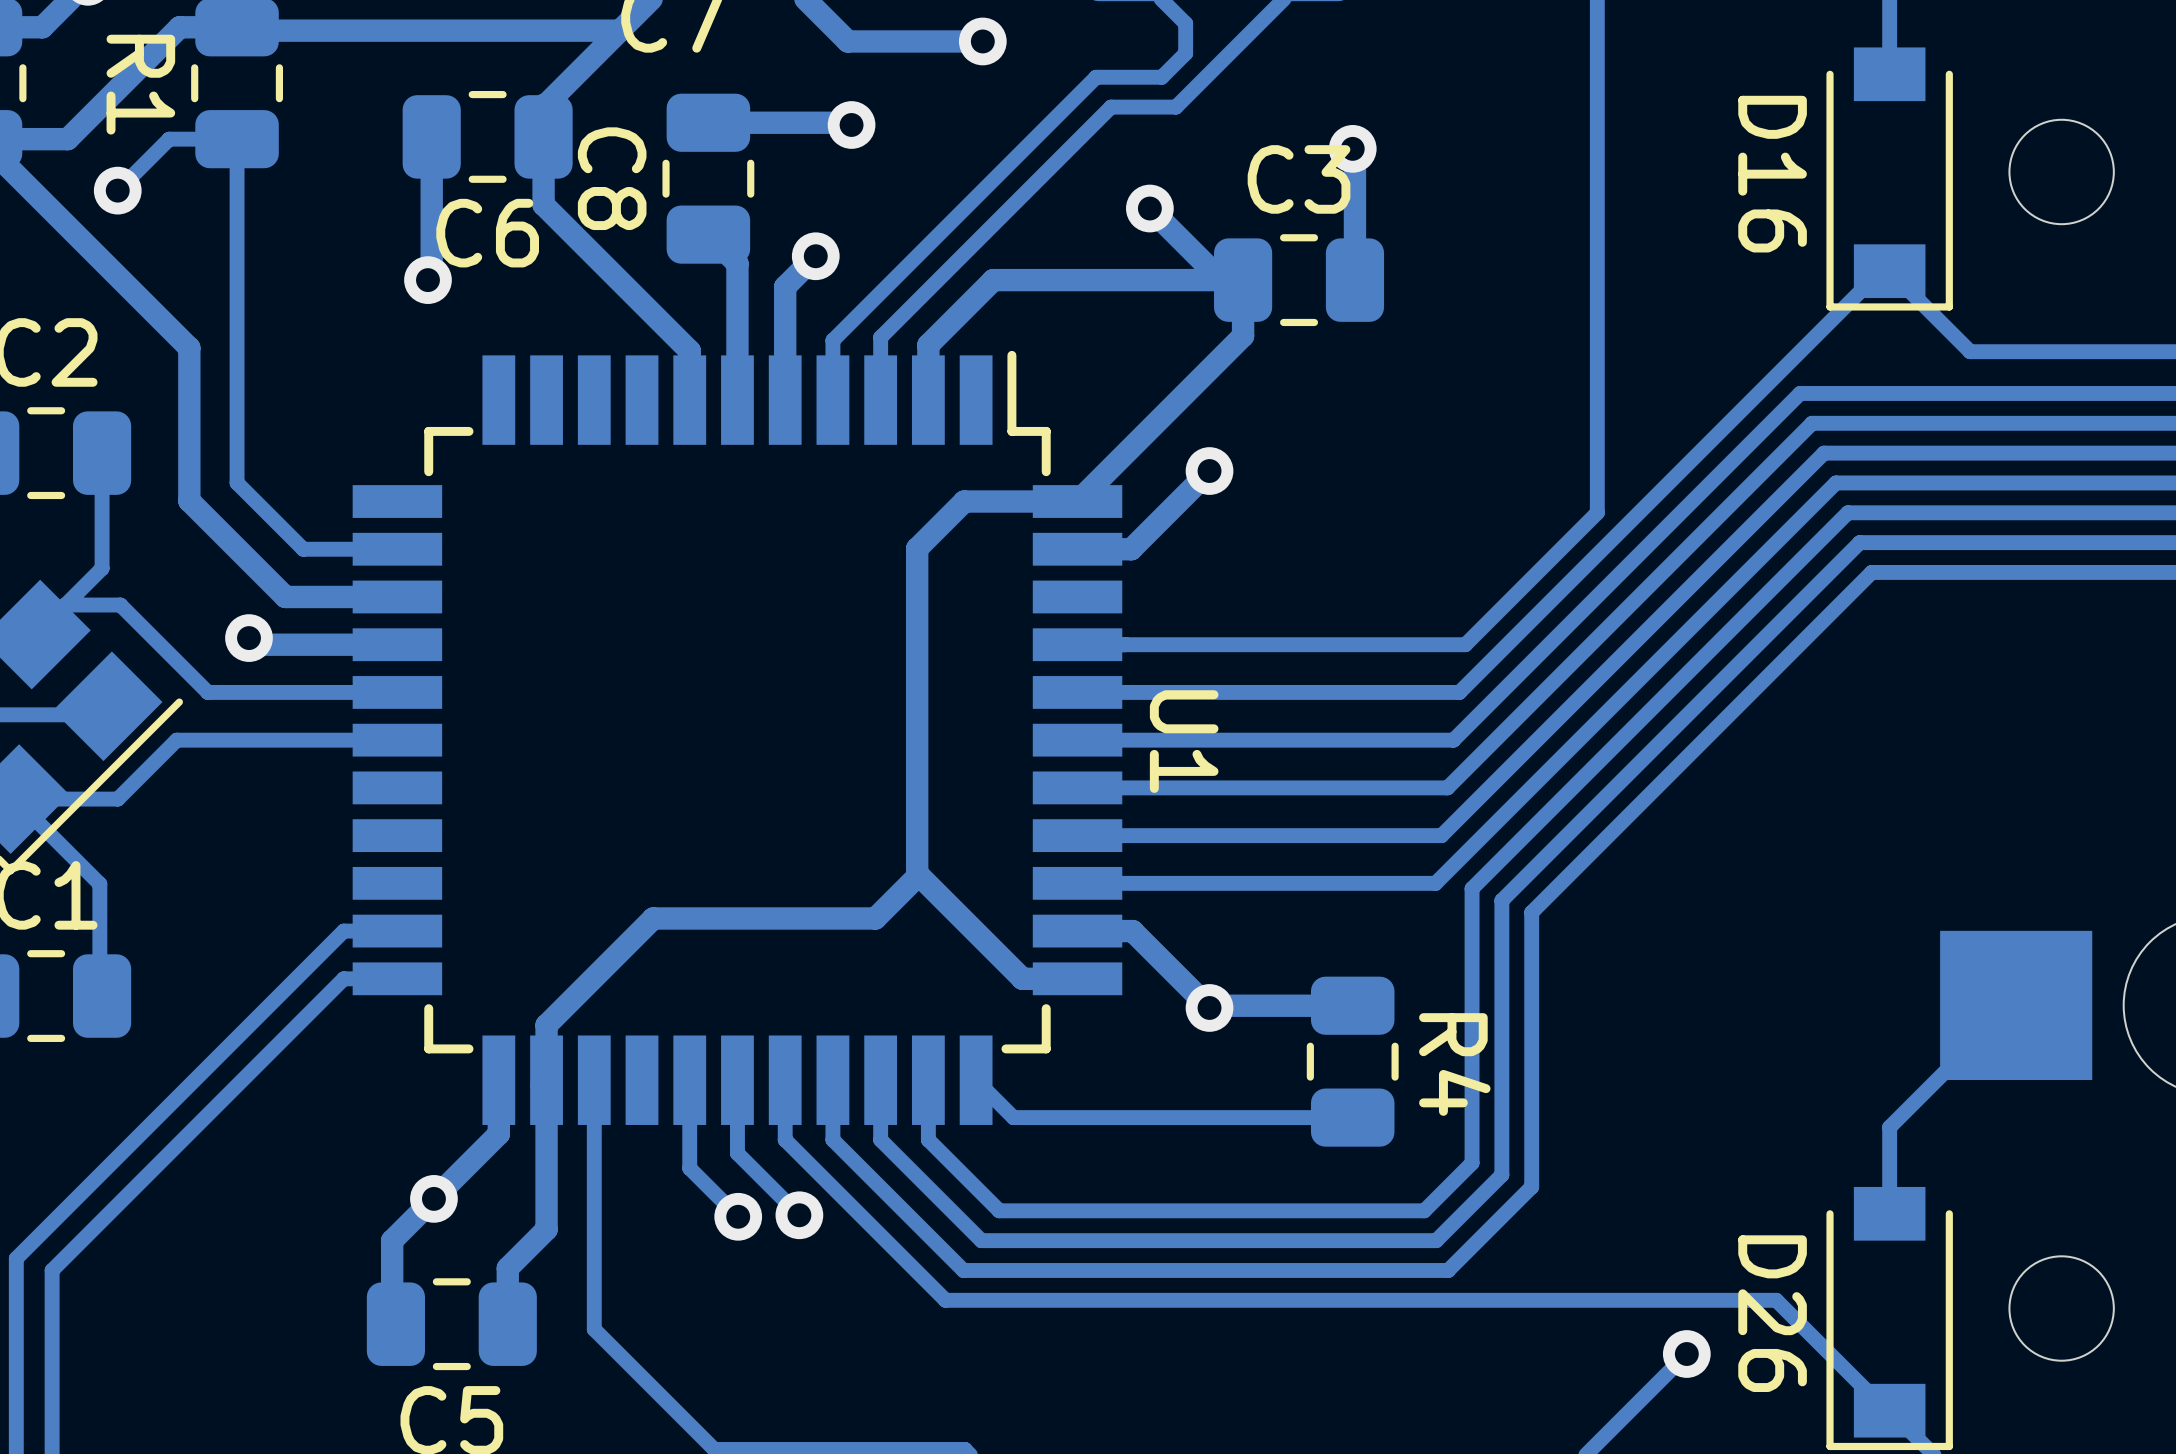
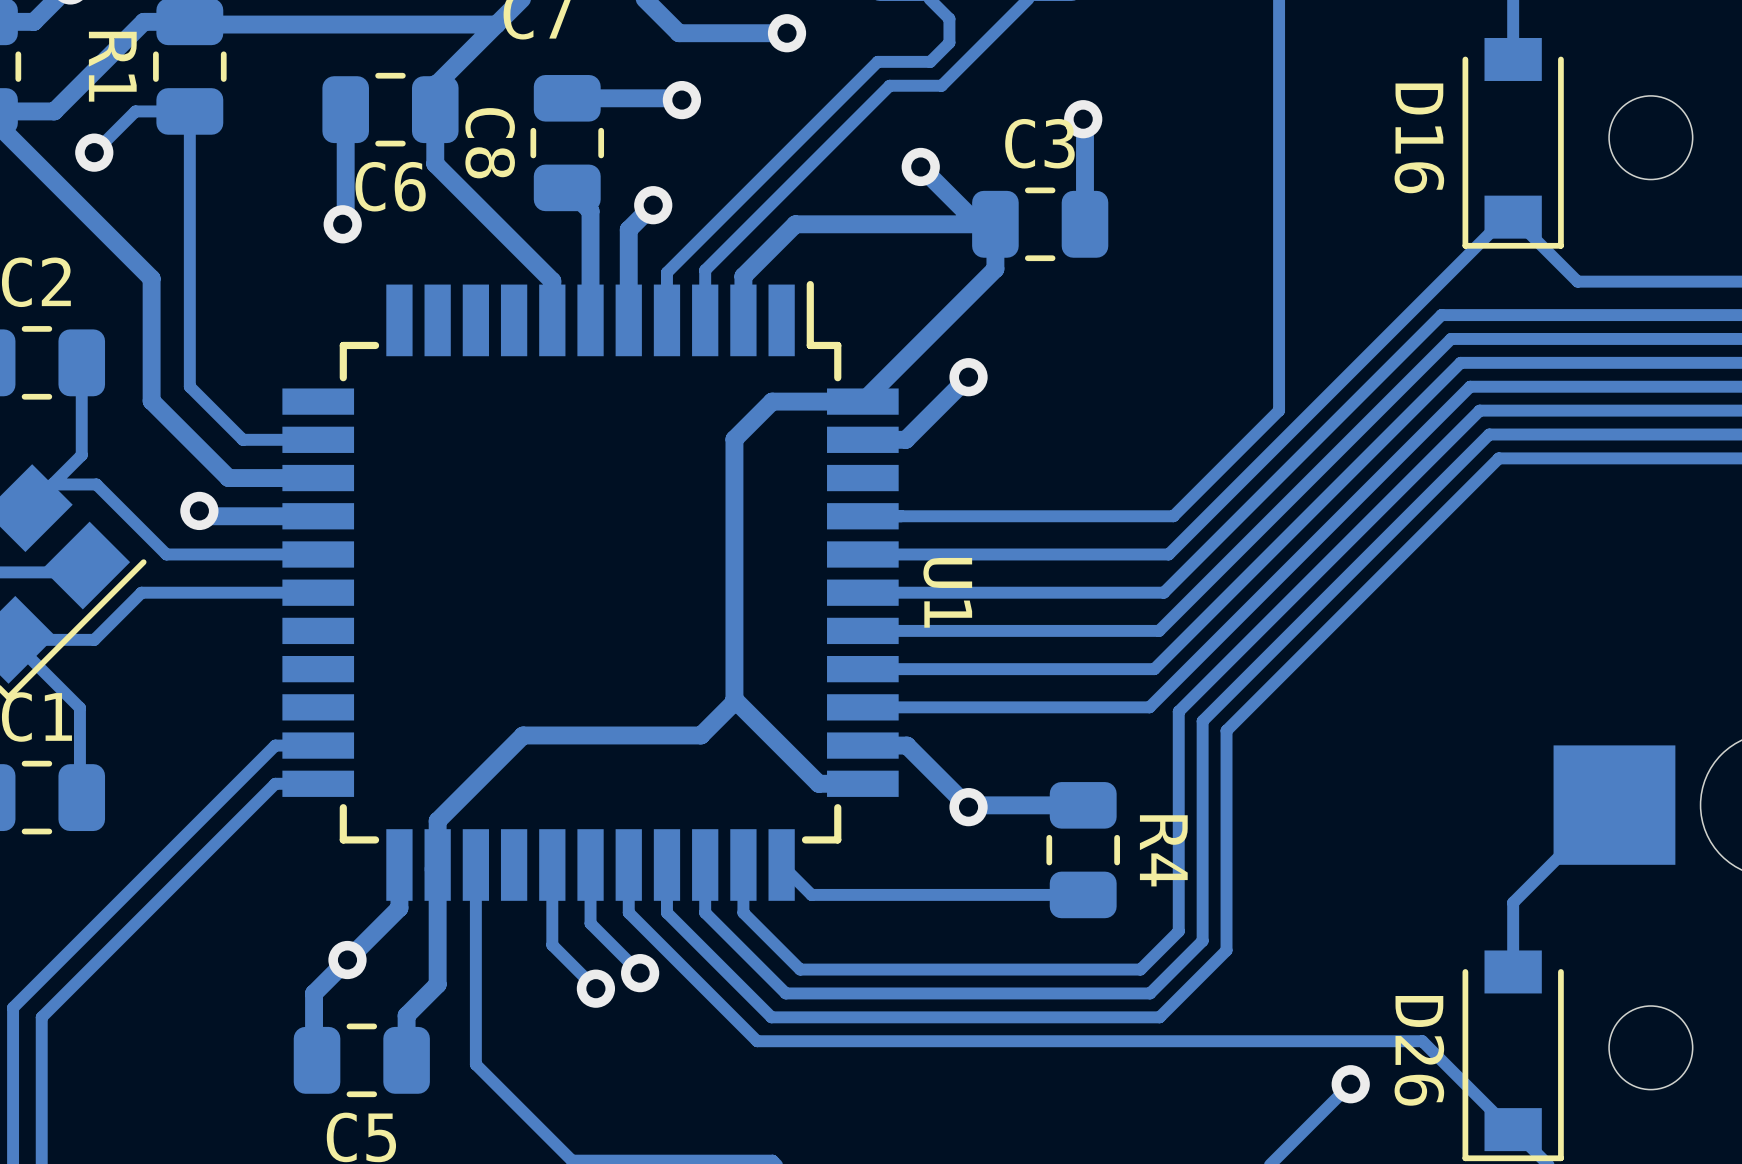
track: (689, 1168) (738, 1216) -> (552, 935) (552, 945) (595, 988)
via position: (738, 1216) -> (595, 988)

